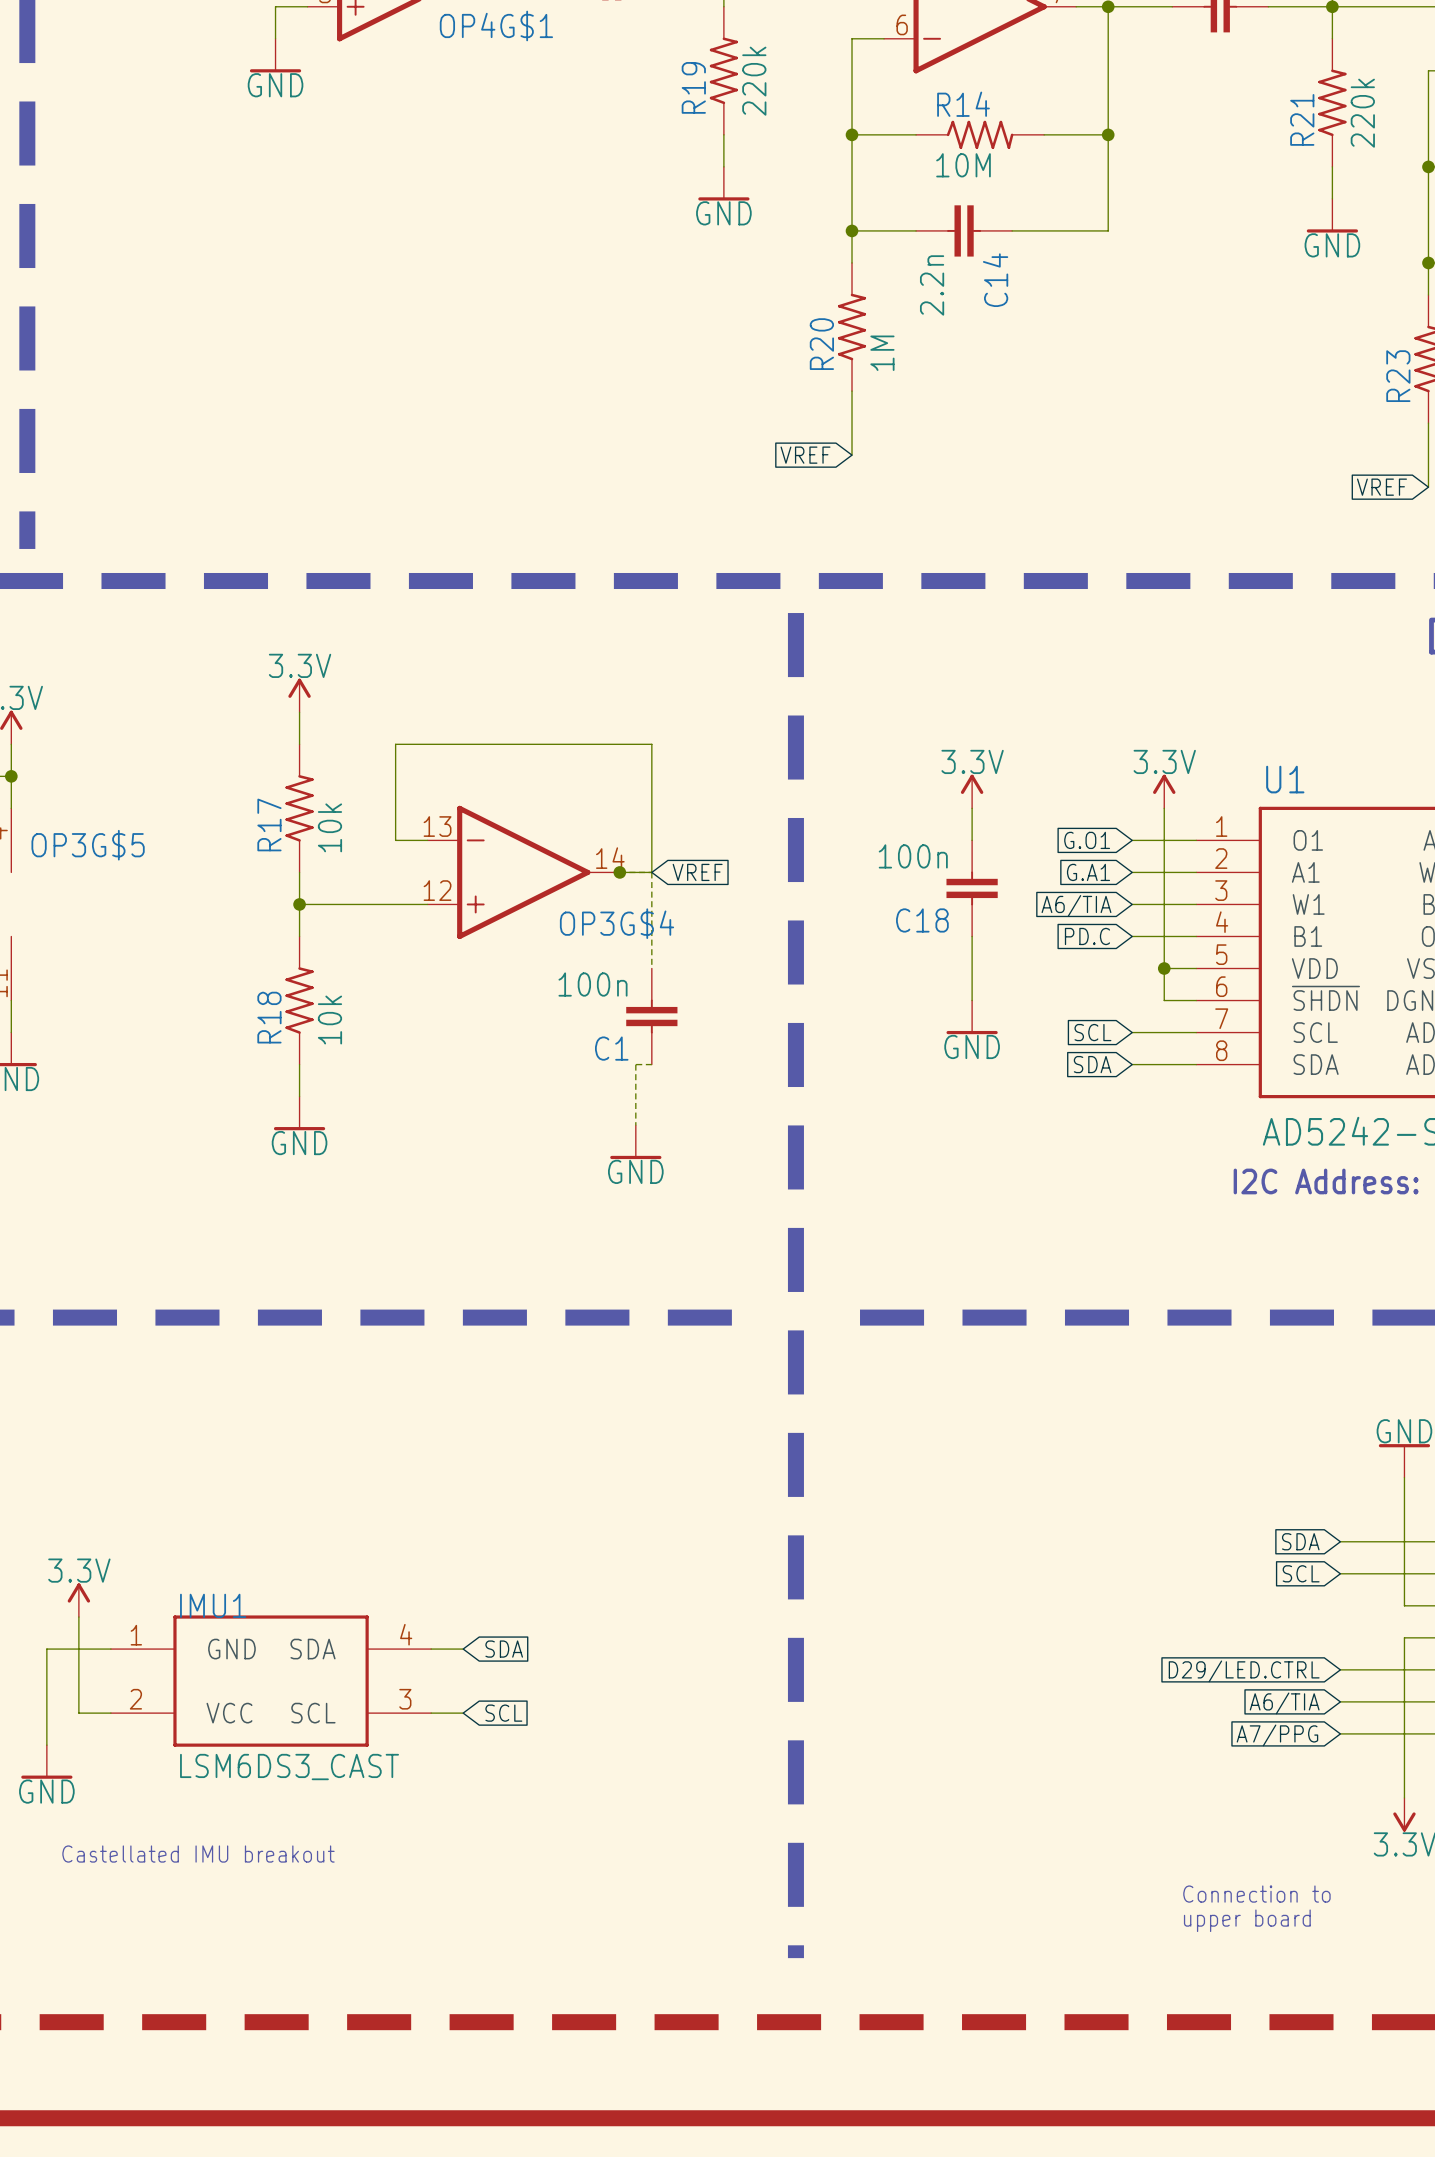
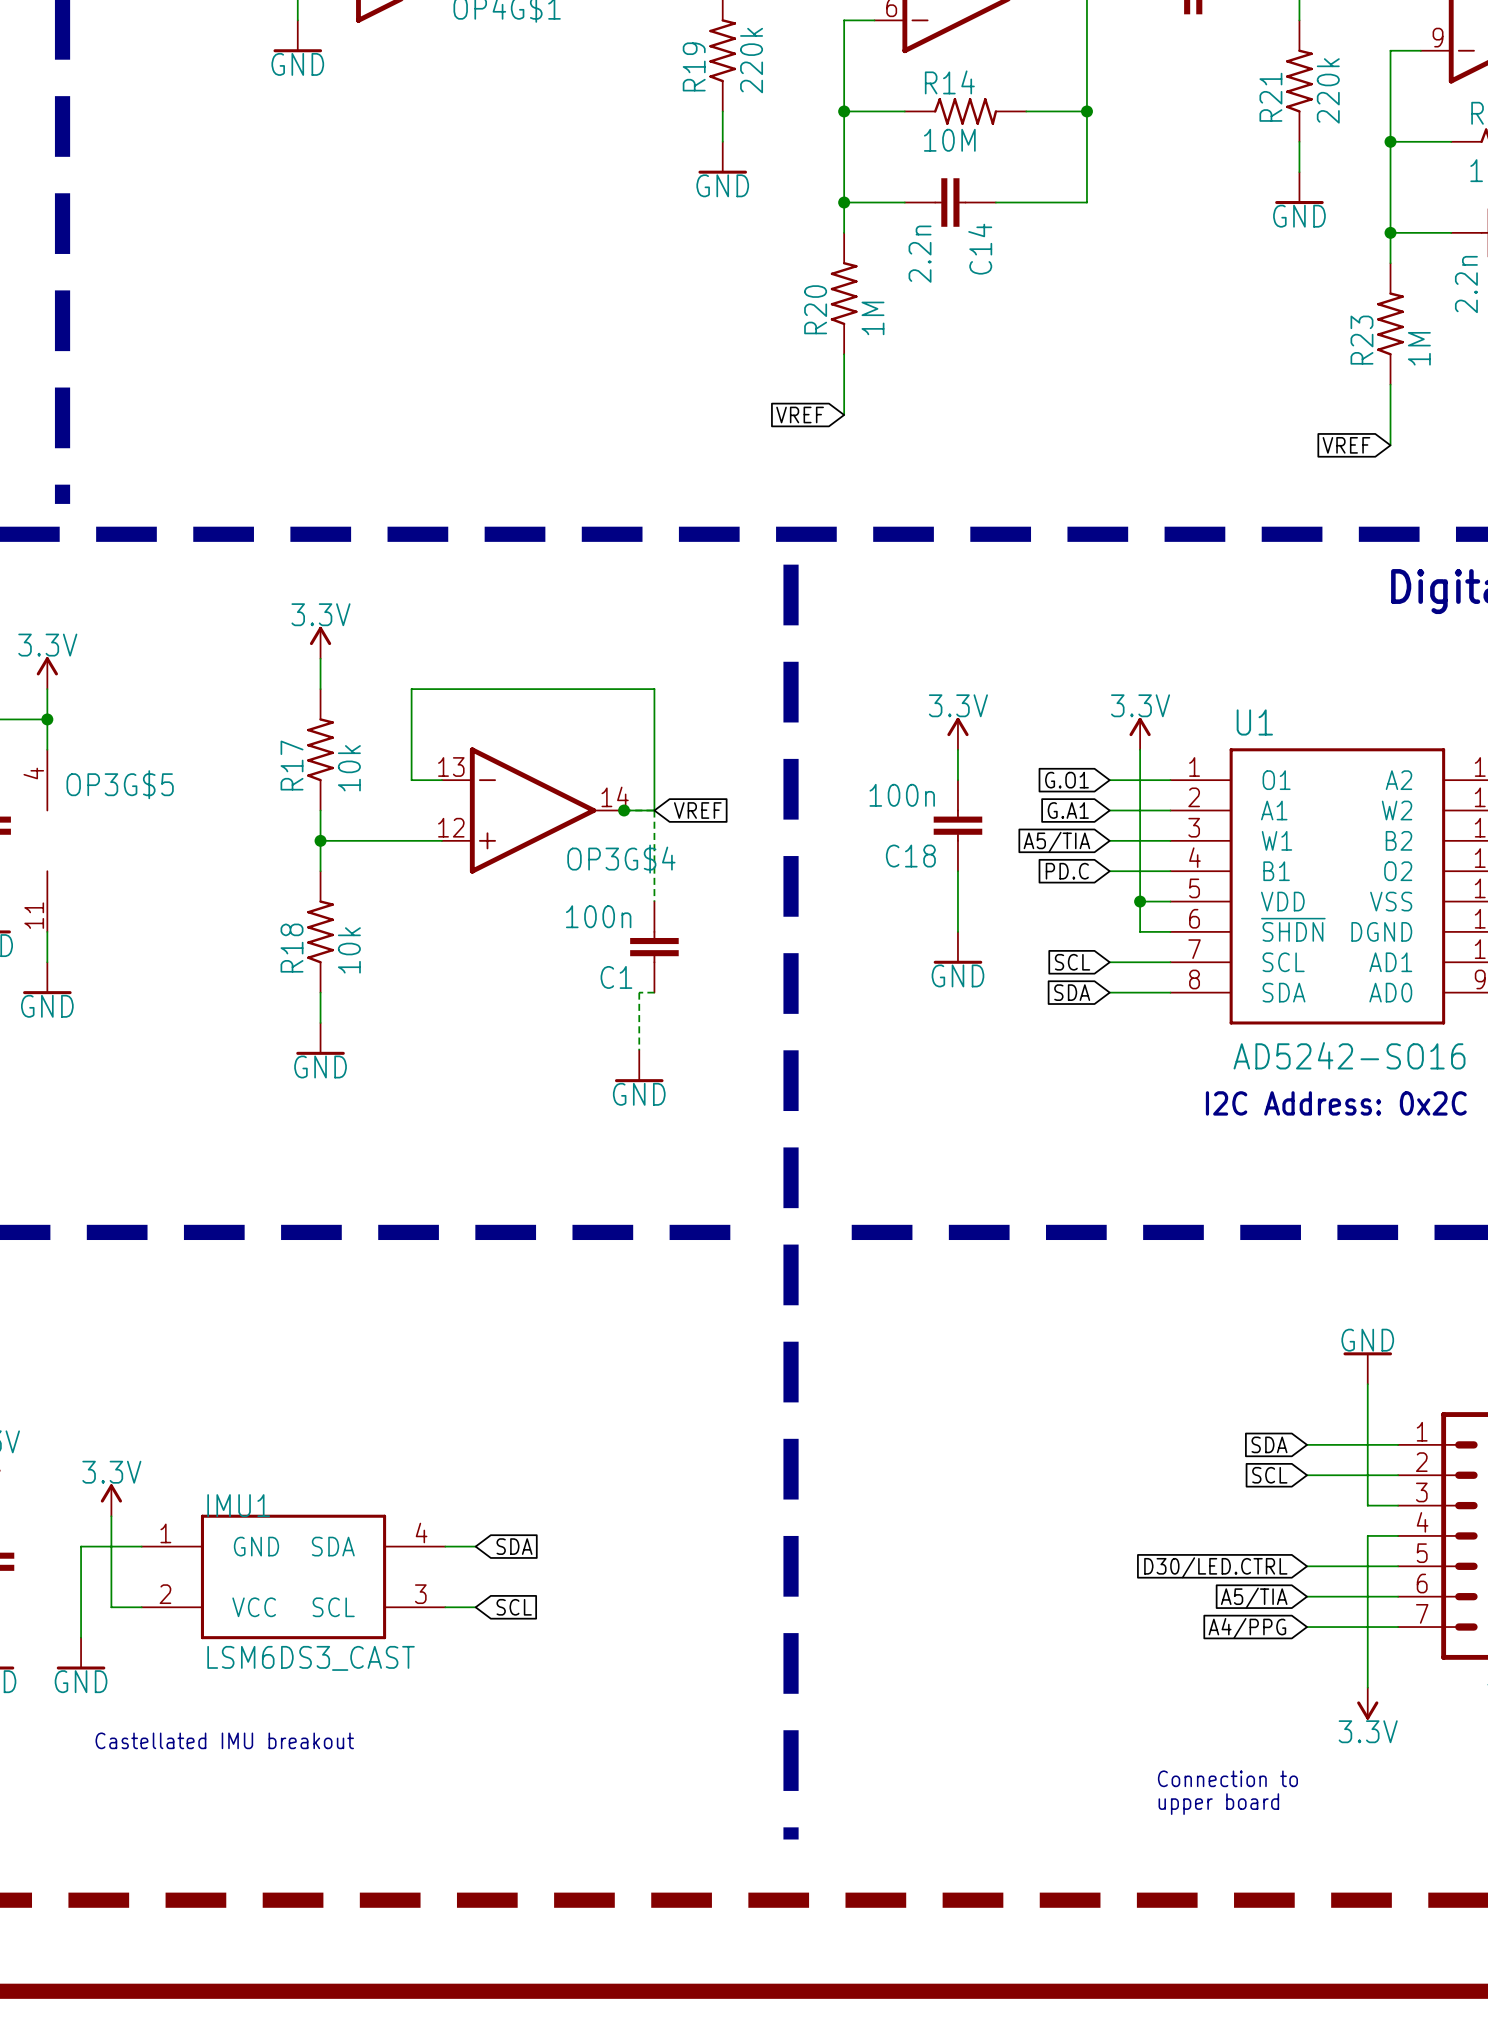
global label: A6/TIA (1076, 905) -> A5/TIA (1056, 842)
global label: D29/LED.CTRL (1244, 1671) -> D30/LED.CTRL (1215, 1567)
global label: A6/TIA (1284, 1703) -> A5/TIA (1254, 1598)
global label: A7/PPG (1277, 1735) -> A4/PPG (1247, 1628)

